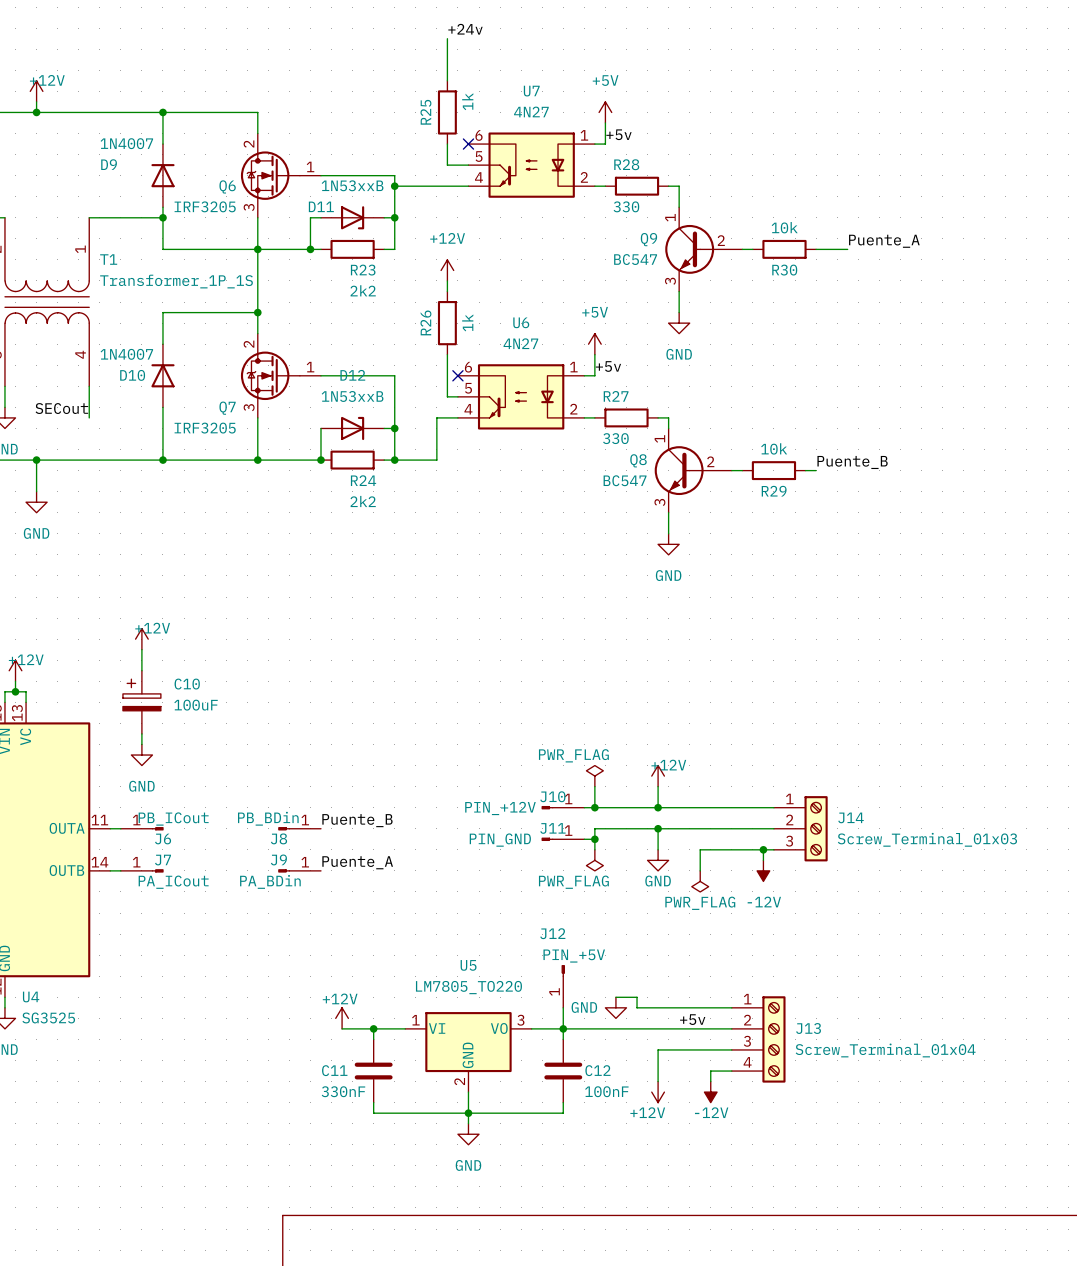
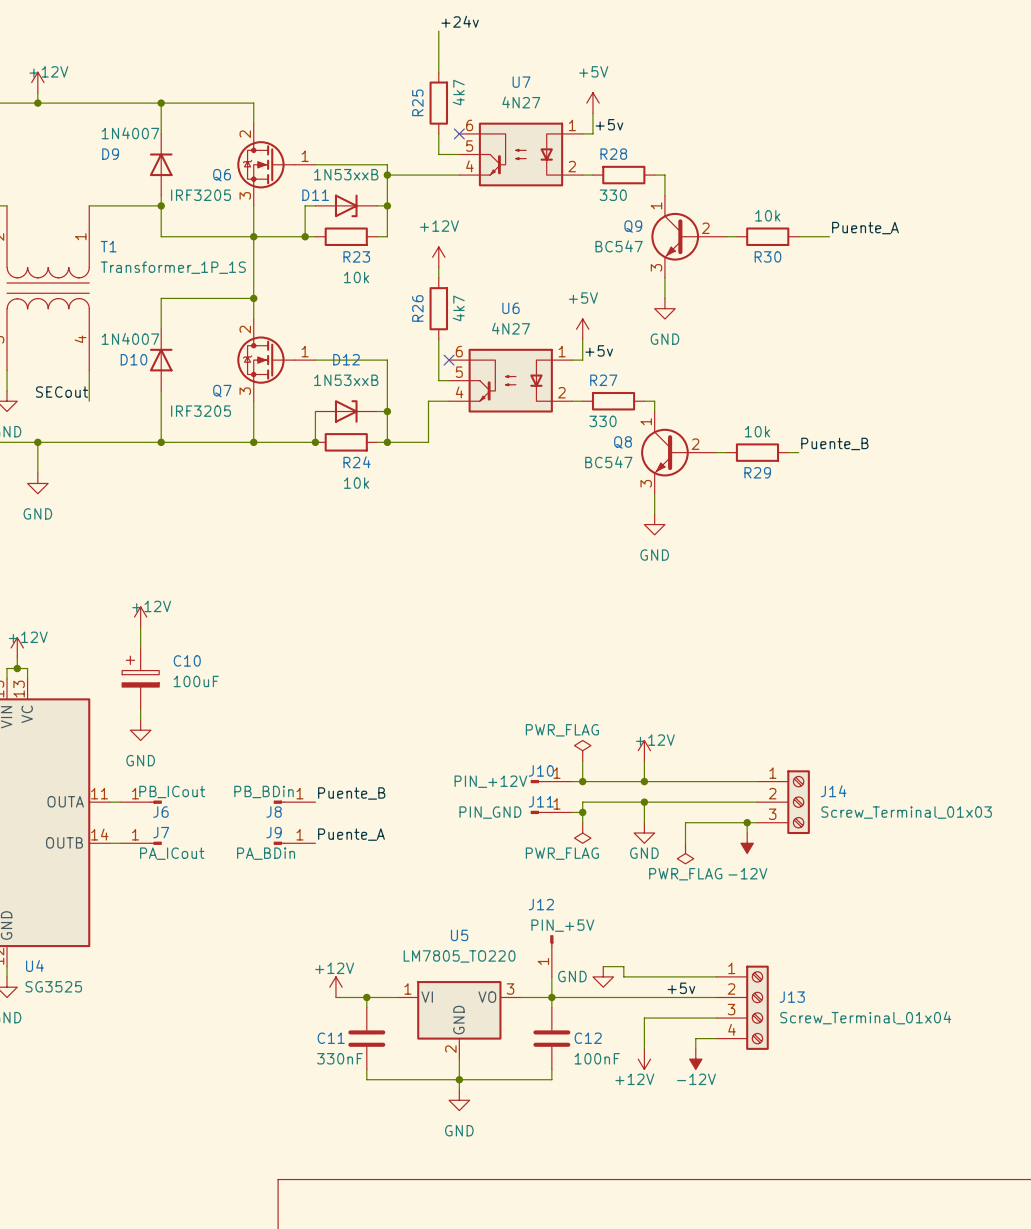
R25 value: 1k (467, 101) -> 4k7 (458, 92)
R23 value: 2k2 (363, 290) -> 10k (356, 277)
R26 value: 1k (467, 322) -> 4k7 (458, 308)
R24 value: 2k2 (363, 501) -> 10k (356, 483)

